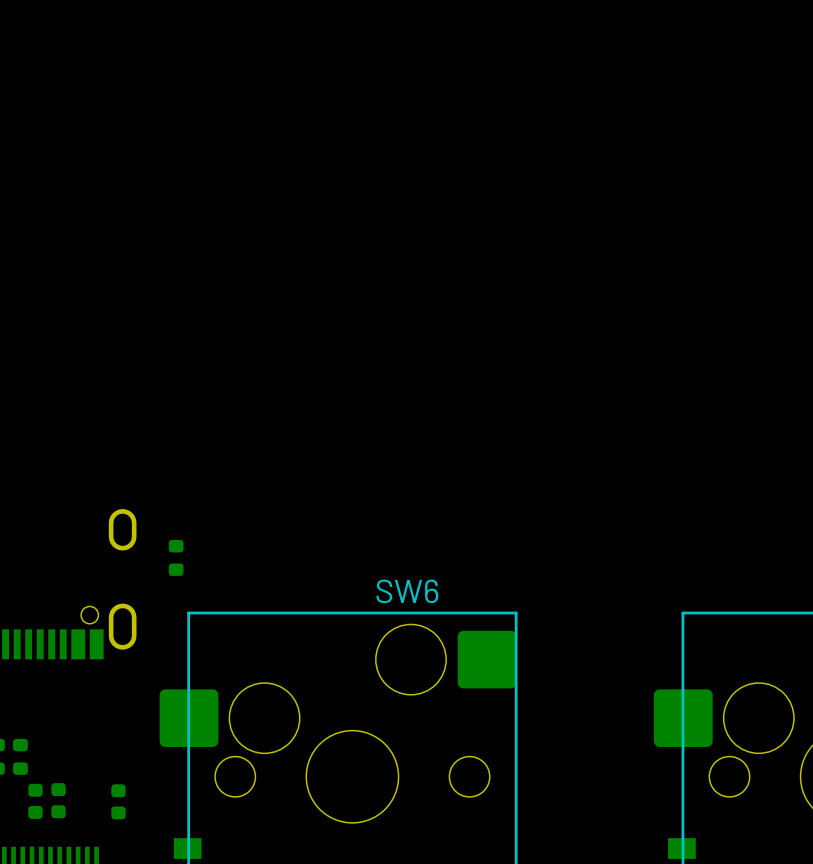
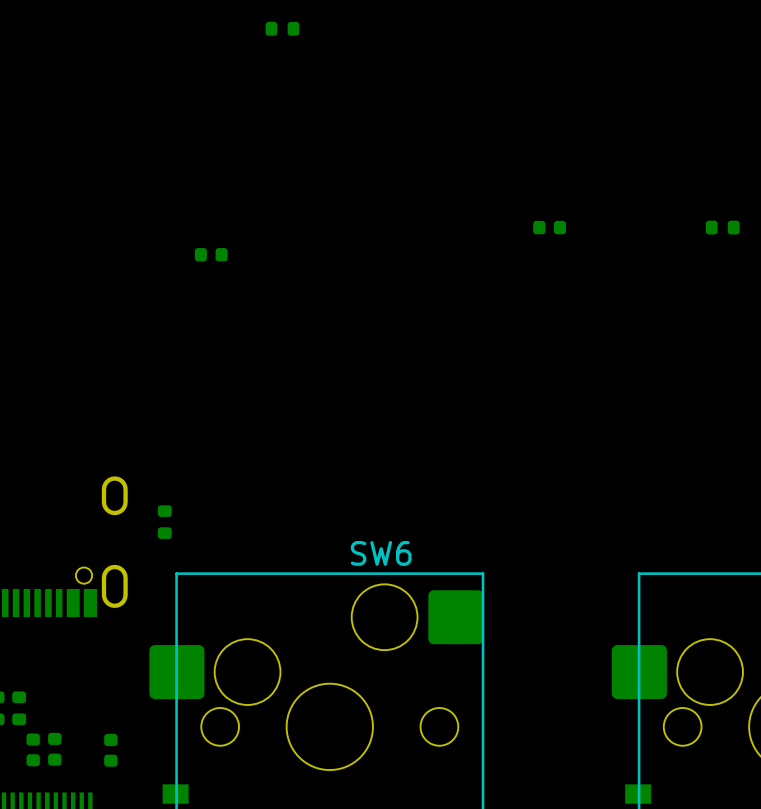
part: none -> (282, 28)
part: none -> (549, 227)
part: none -> (722, 227)
part: none -> (211, 254)

